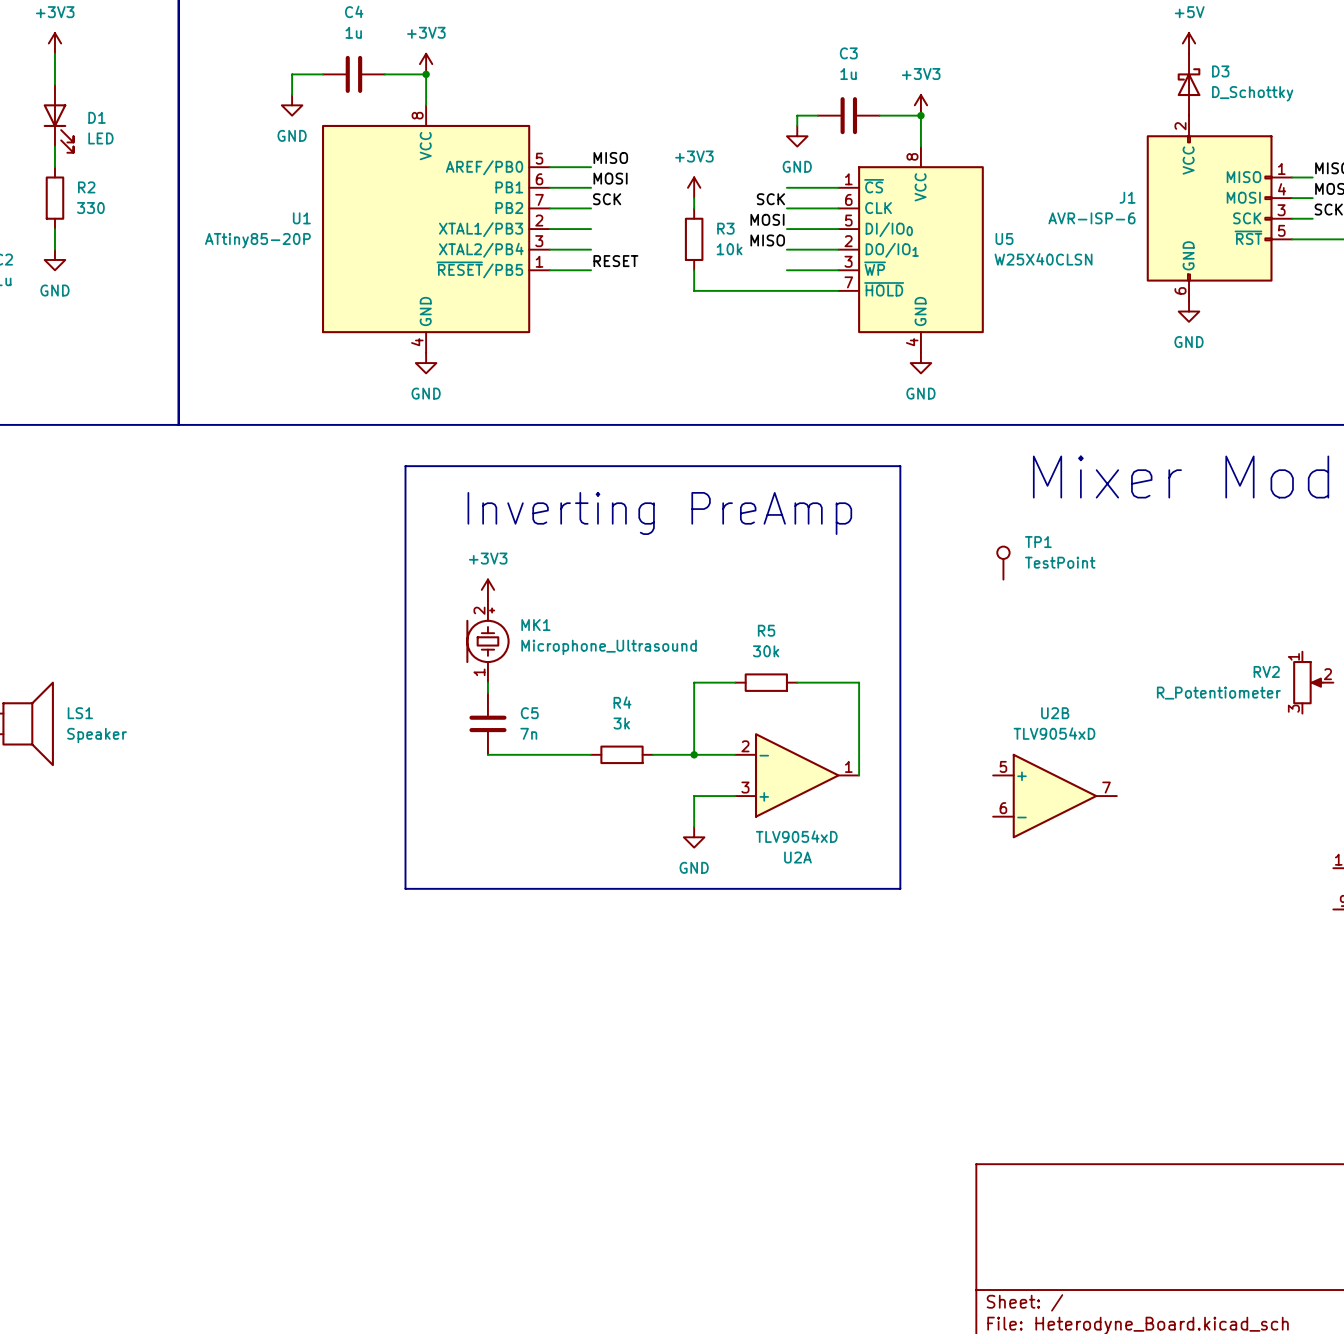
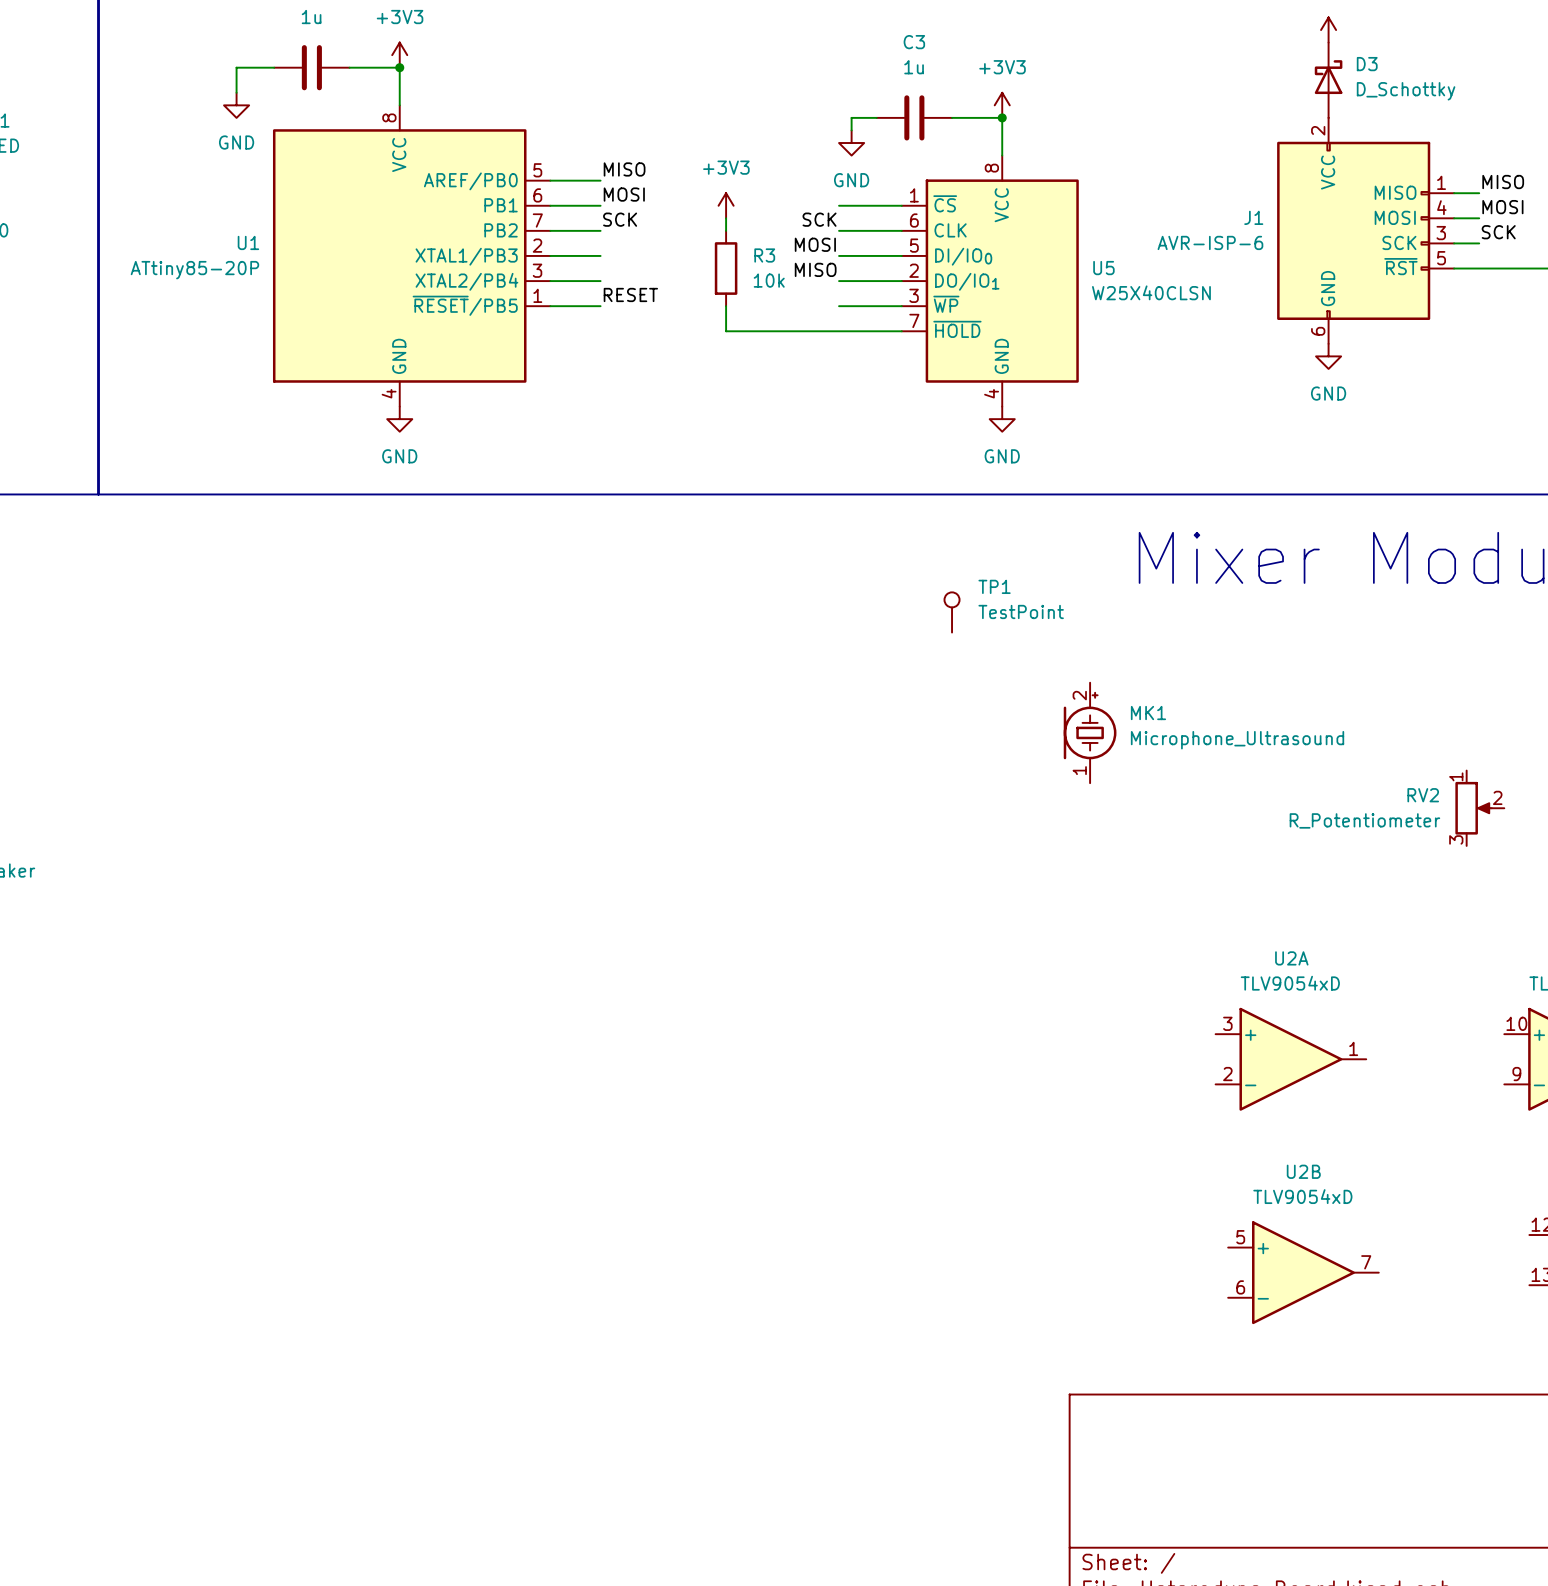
line: (405, 466) (900, 466) (900, 888) (405, 888) (405, 466) -> none
text: Inverting PreAmp (659, 513) -> none
TP1 position: (1003, 563) -> (952, 612)
power symbol: +3V3 (487, 589) -> none
MK1 position: (487, 641) -> (1090, 732)
wire: (487, 682) (487, 692) -> none
wire: (735, 682) (694, 682) (694, 754) -> none
R5: 30k (766, 682) -> none
wire: (797, 682) (859, 682) (859, 775) -> none
C5: 7n (487, 723) -> none
wire: (487, 754) (591, 754) -> none
R4: 3k (621, 754) -> none
wire: (652, 754) (735, 754) -> none
junction: (694, 754) -> none
U2A flip: as is (797, 775) -> up-down (1290, 1059)
U2A position: (797, 775) -> (1290, 1059)
wire: (735, 796) (694, 796) (694, 826) -> none
U2B position: (1054, 796) -> (1303, 1272)
power symbol: GND (694, 837) -> none

